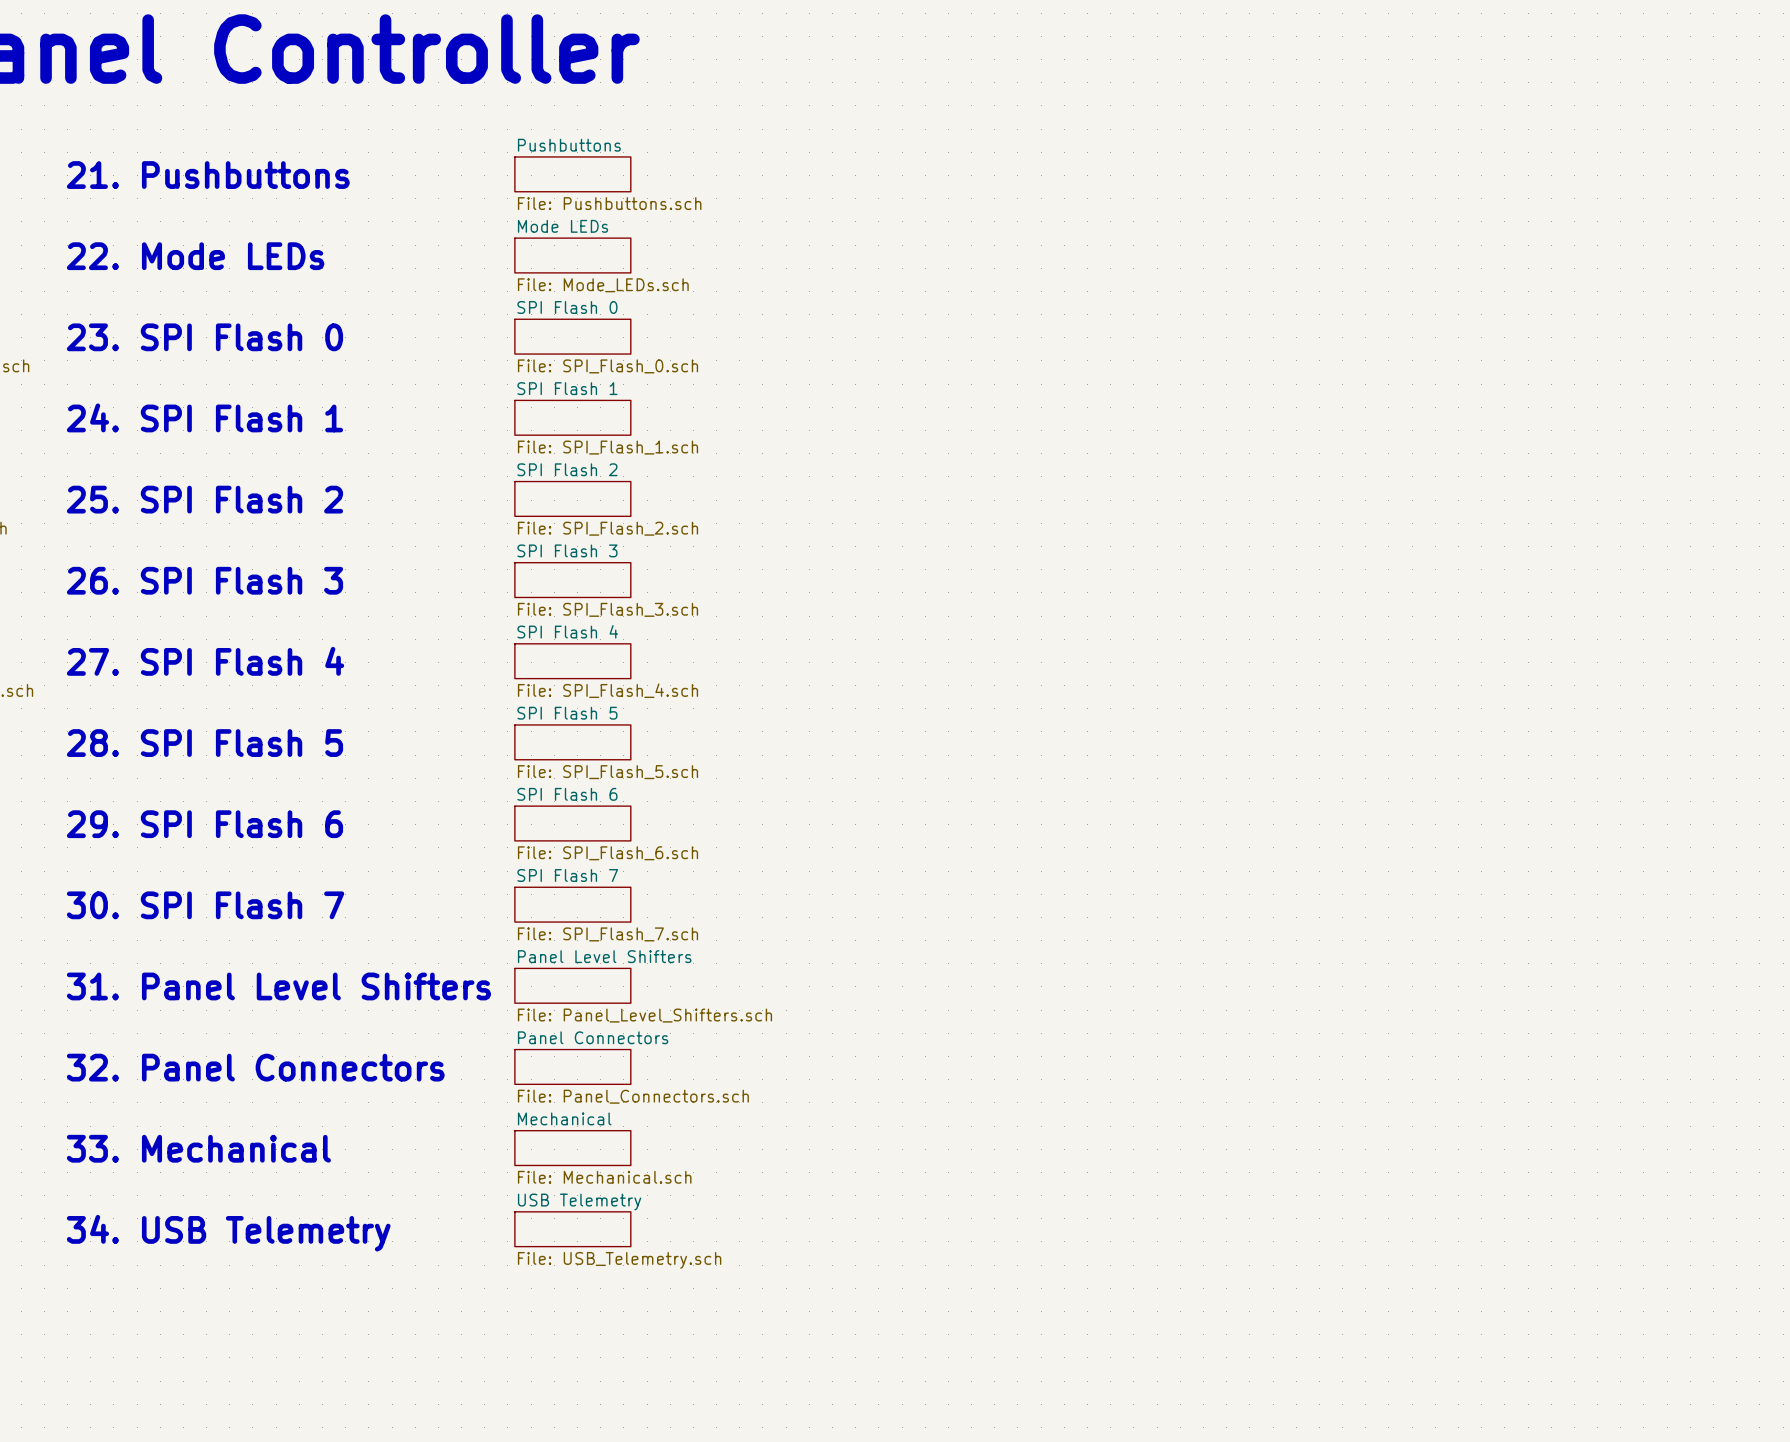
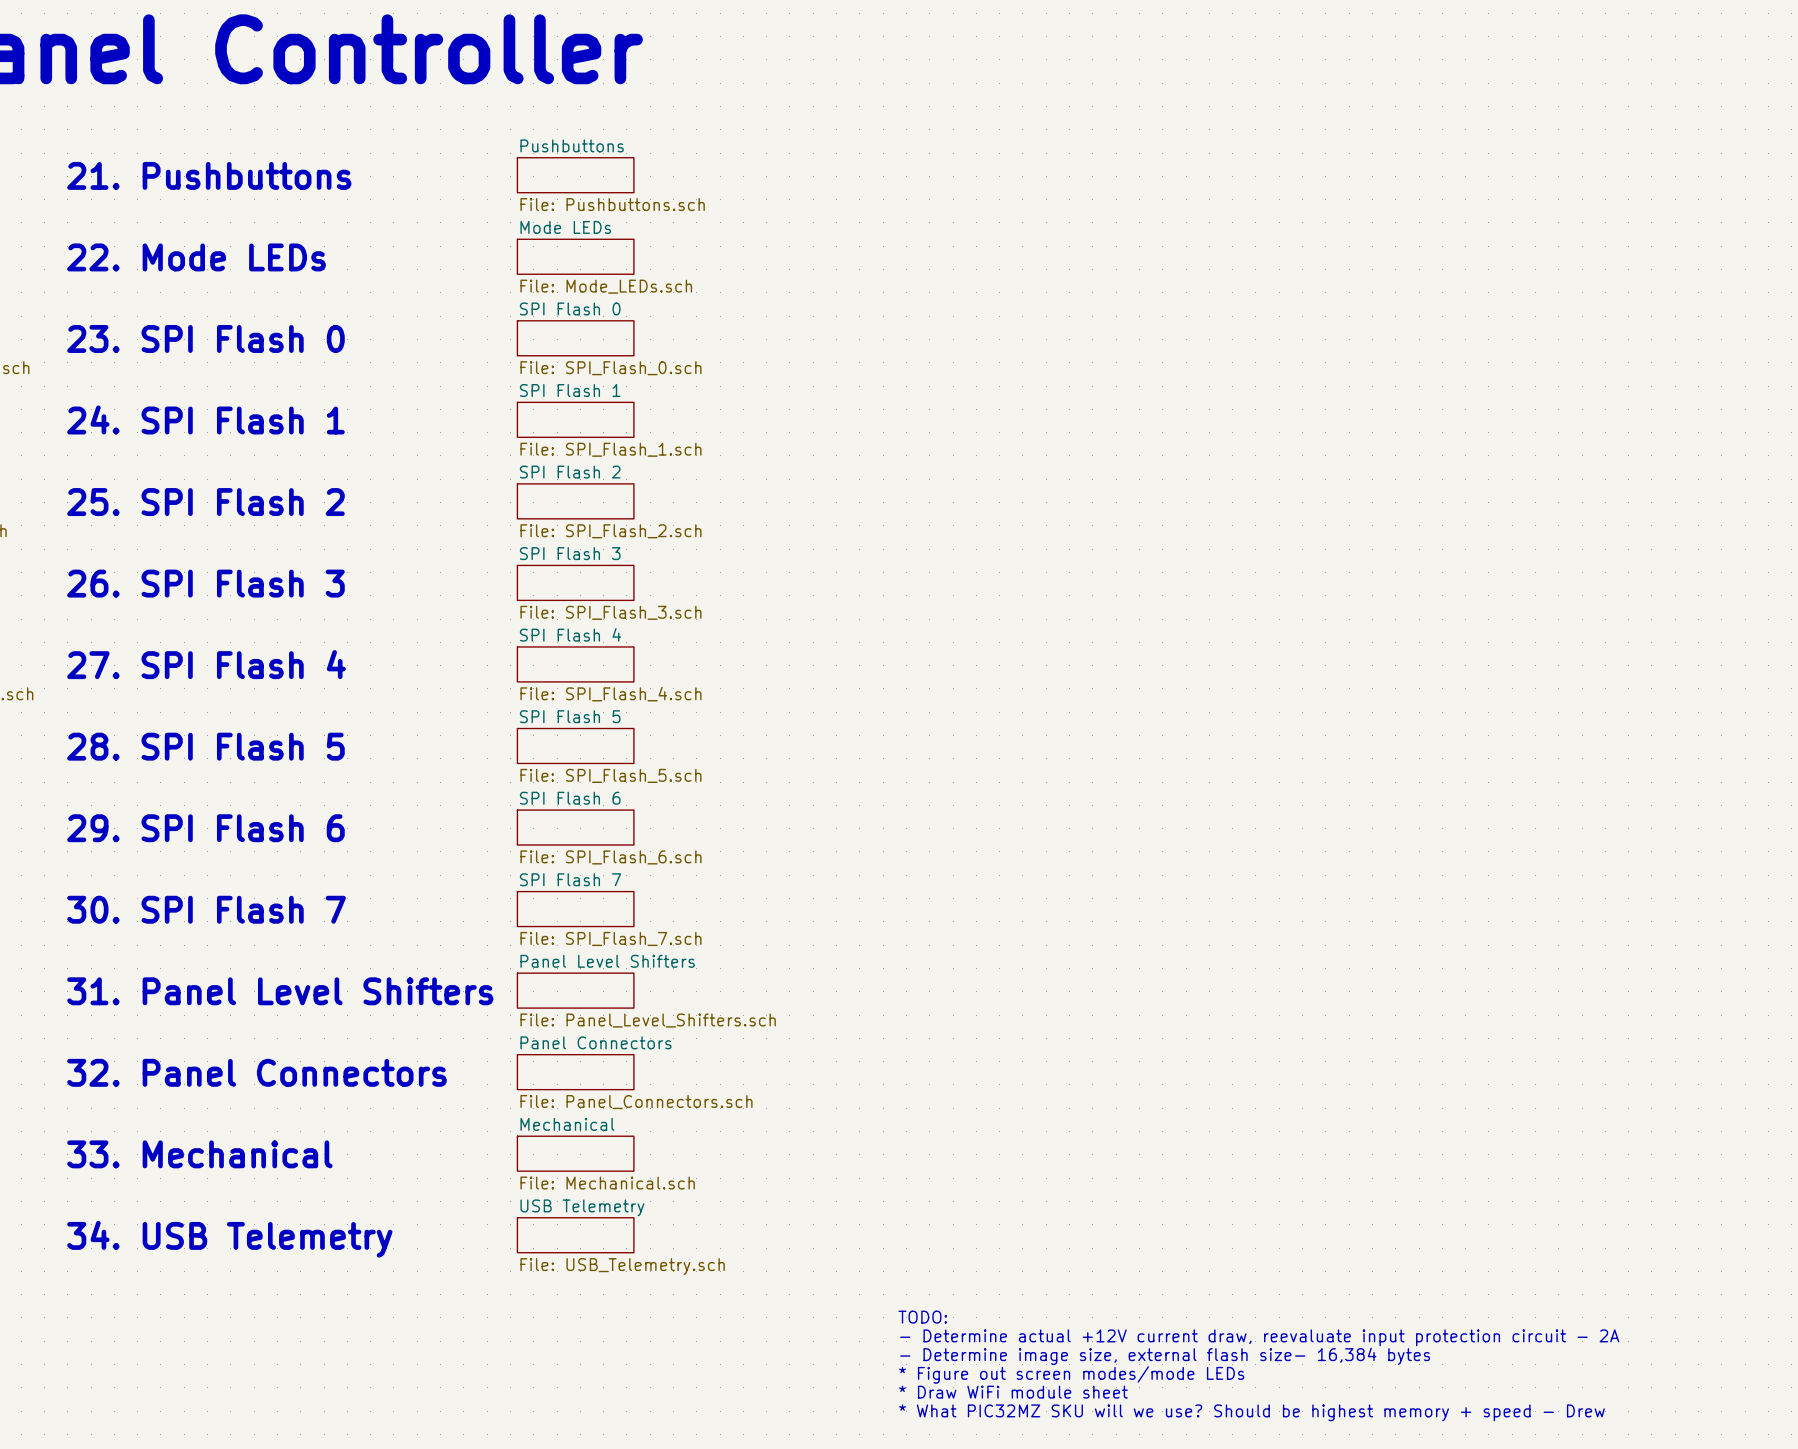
text: none -> TODO: (922, 1317)
text: none -> - Determine actual +12V current draw, reevaluate input protection circuit - 2A (1259, 1337)
text: none -> - Determine image size, external flash size- 16,384 bytes (1165, 1356)
text: none -> * Figure out screen modes/mode LEDs (1071, 1375)
text: none -> * Draw WiFi module sheet (1013, 1392)
text: none -> * What PIC32MZ SKU will we use? Should be highest memory + speed - Drew (1251, 1412)

